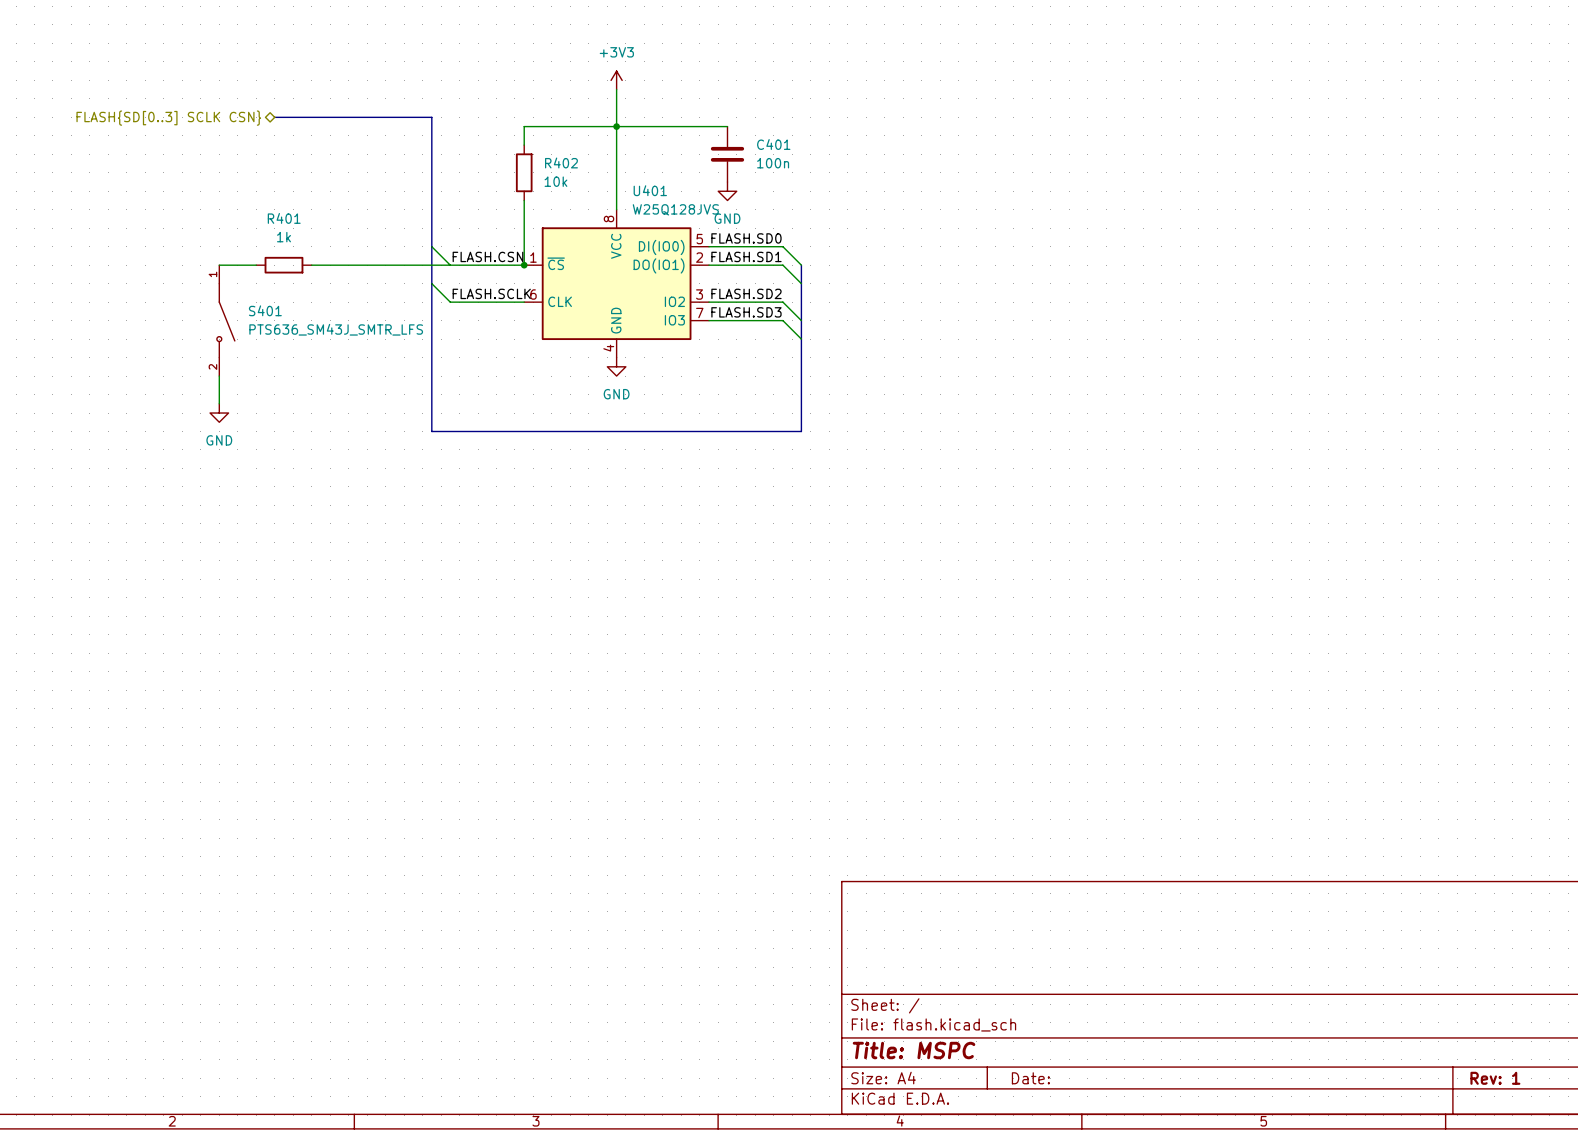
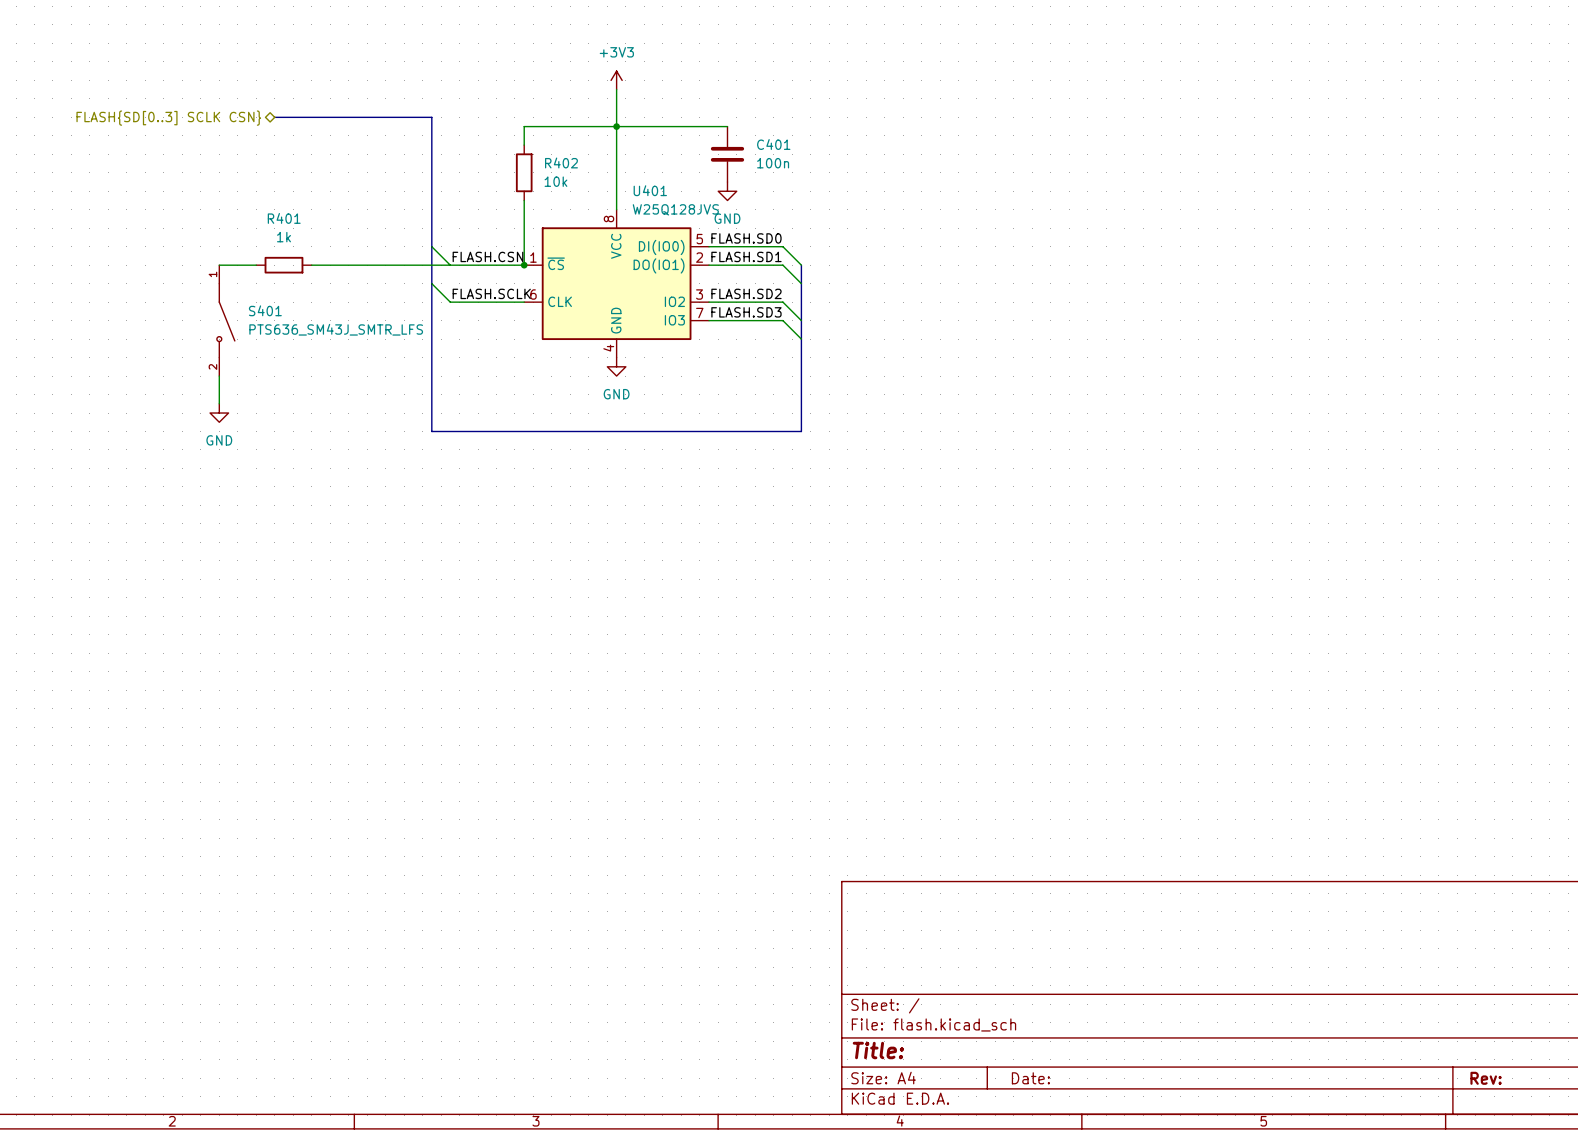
title block: Title: MSPC (914, 1050) -> Title: (878, 1050)
title block: Rev: 1 (1495, 1078) -> Rev: (1486, 1078)

